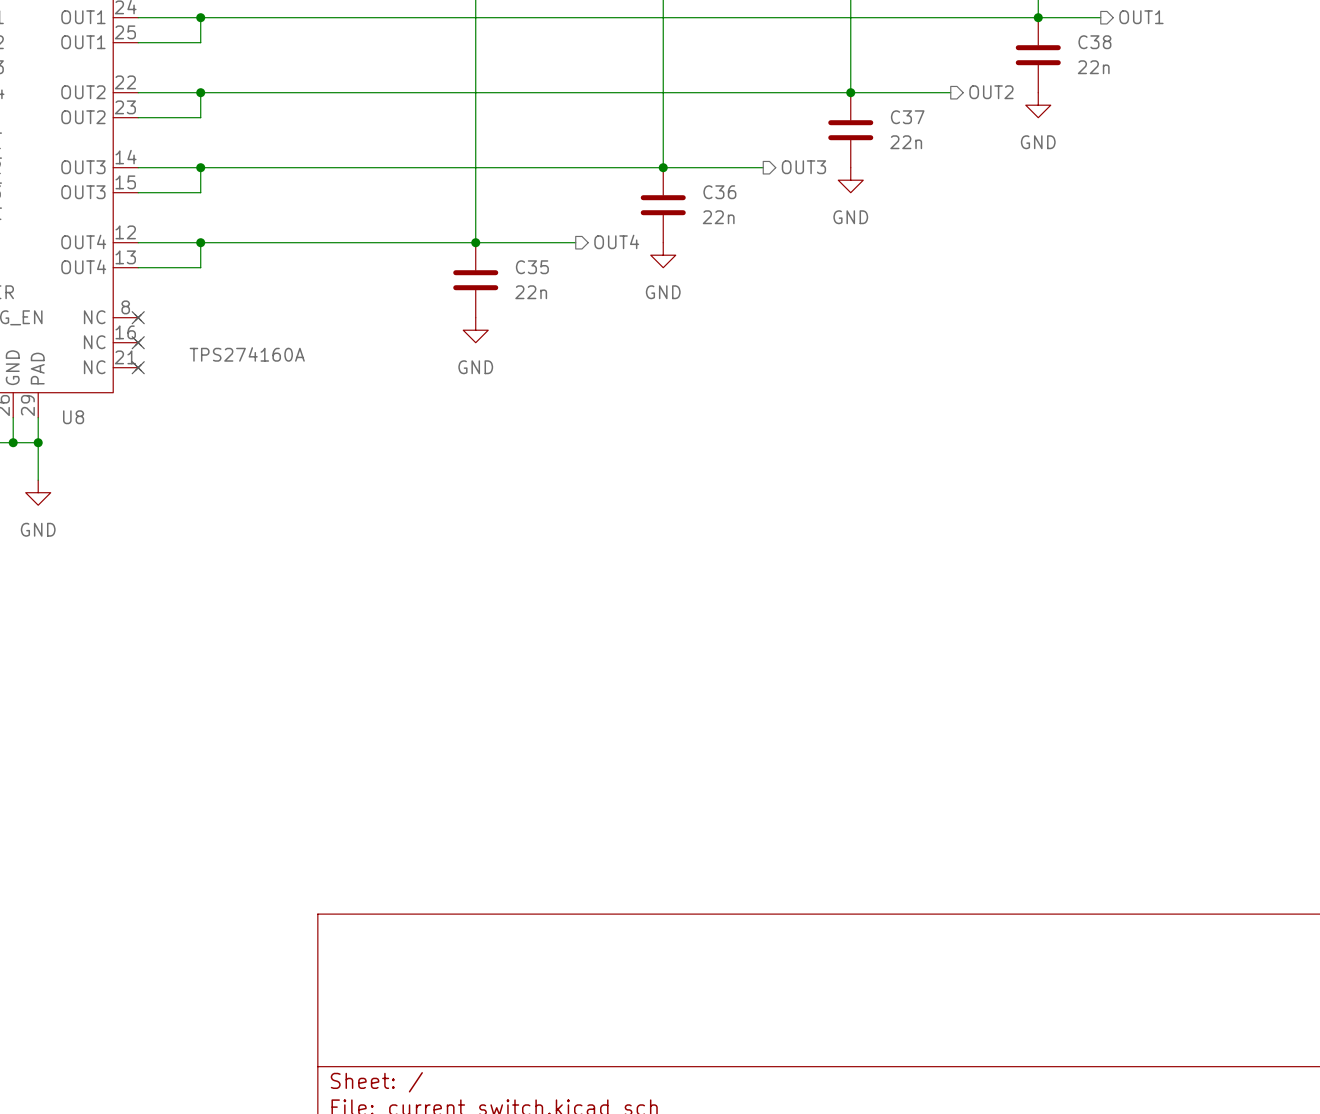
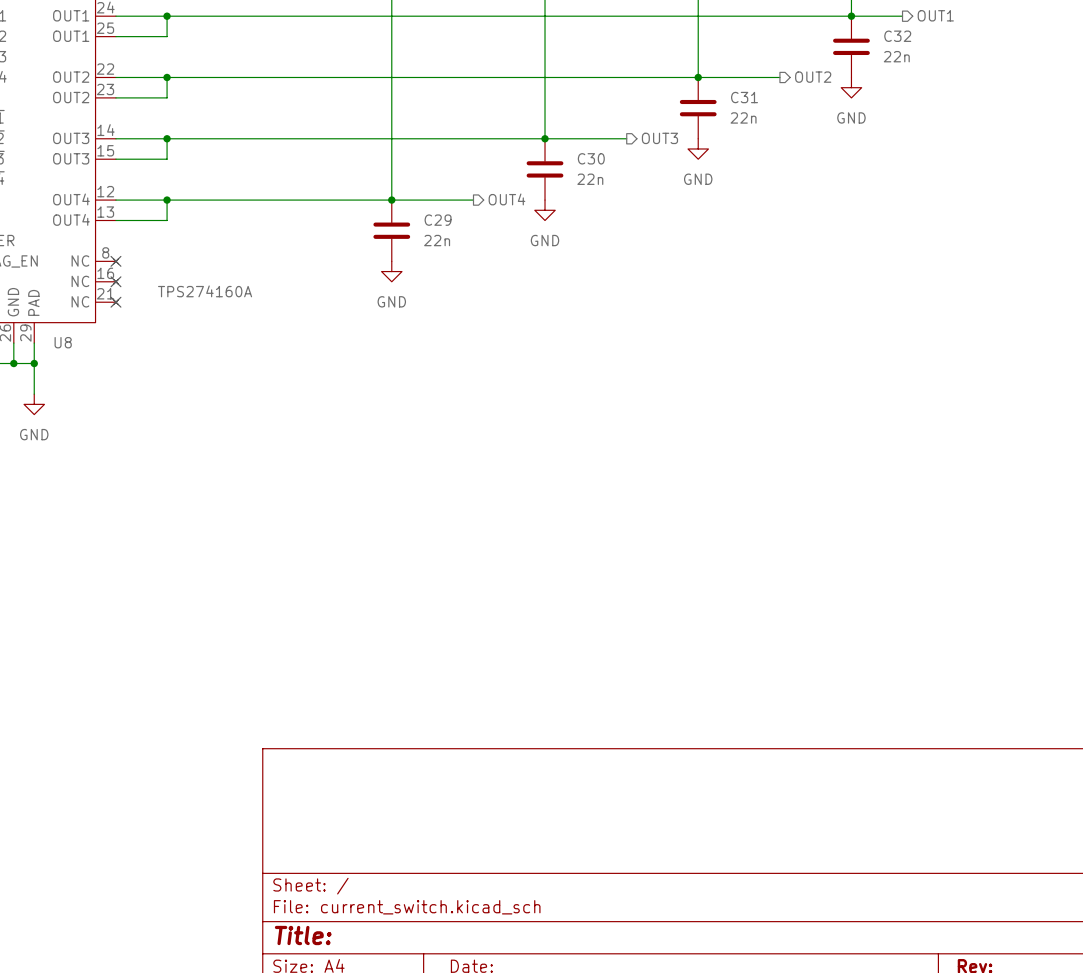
C38 name: C38 (1094, 42) -> C32 (897, 36)
C37 name: C37 (907, 117) -> C31 (744, 97)
C36 name: C36 (719, 192) -> C30 (591, 158)
C35 name: C35 (532, 267) -> C29 (438, 220)

